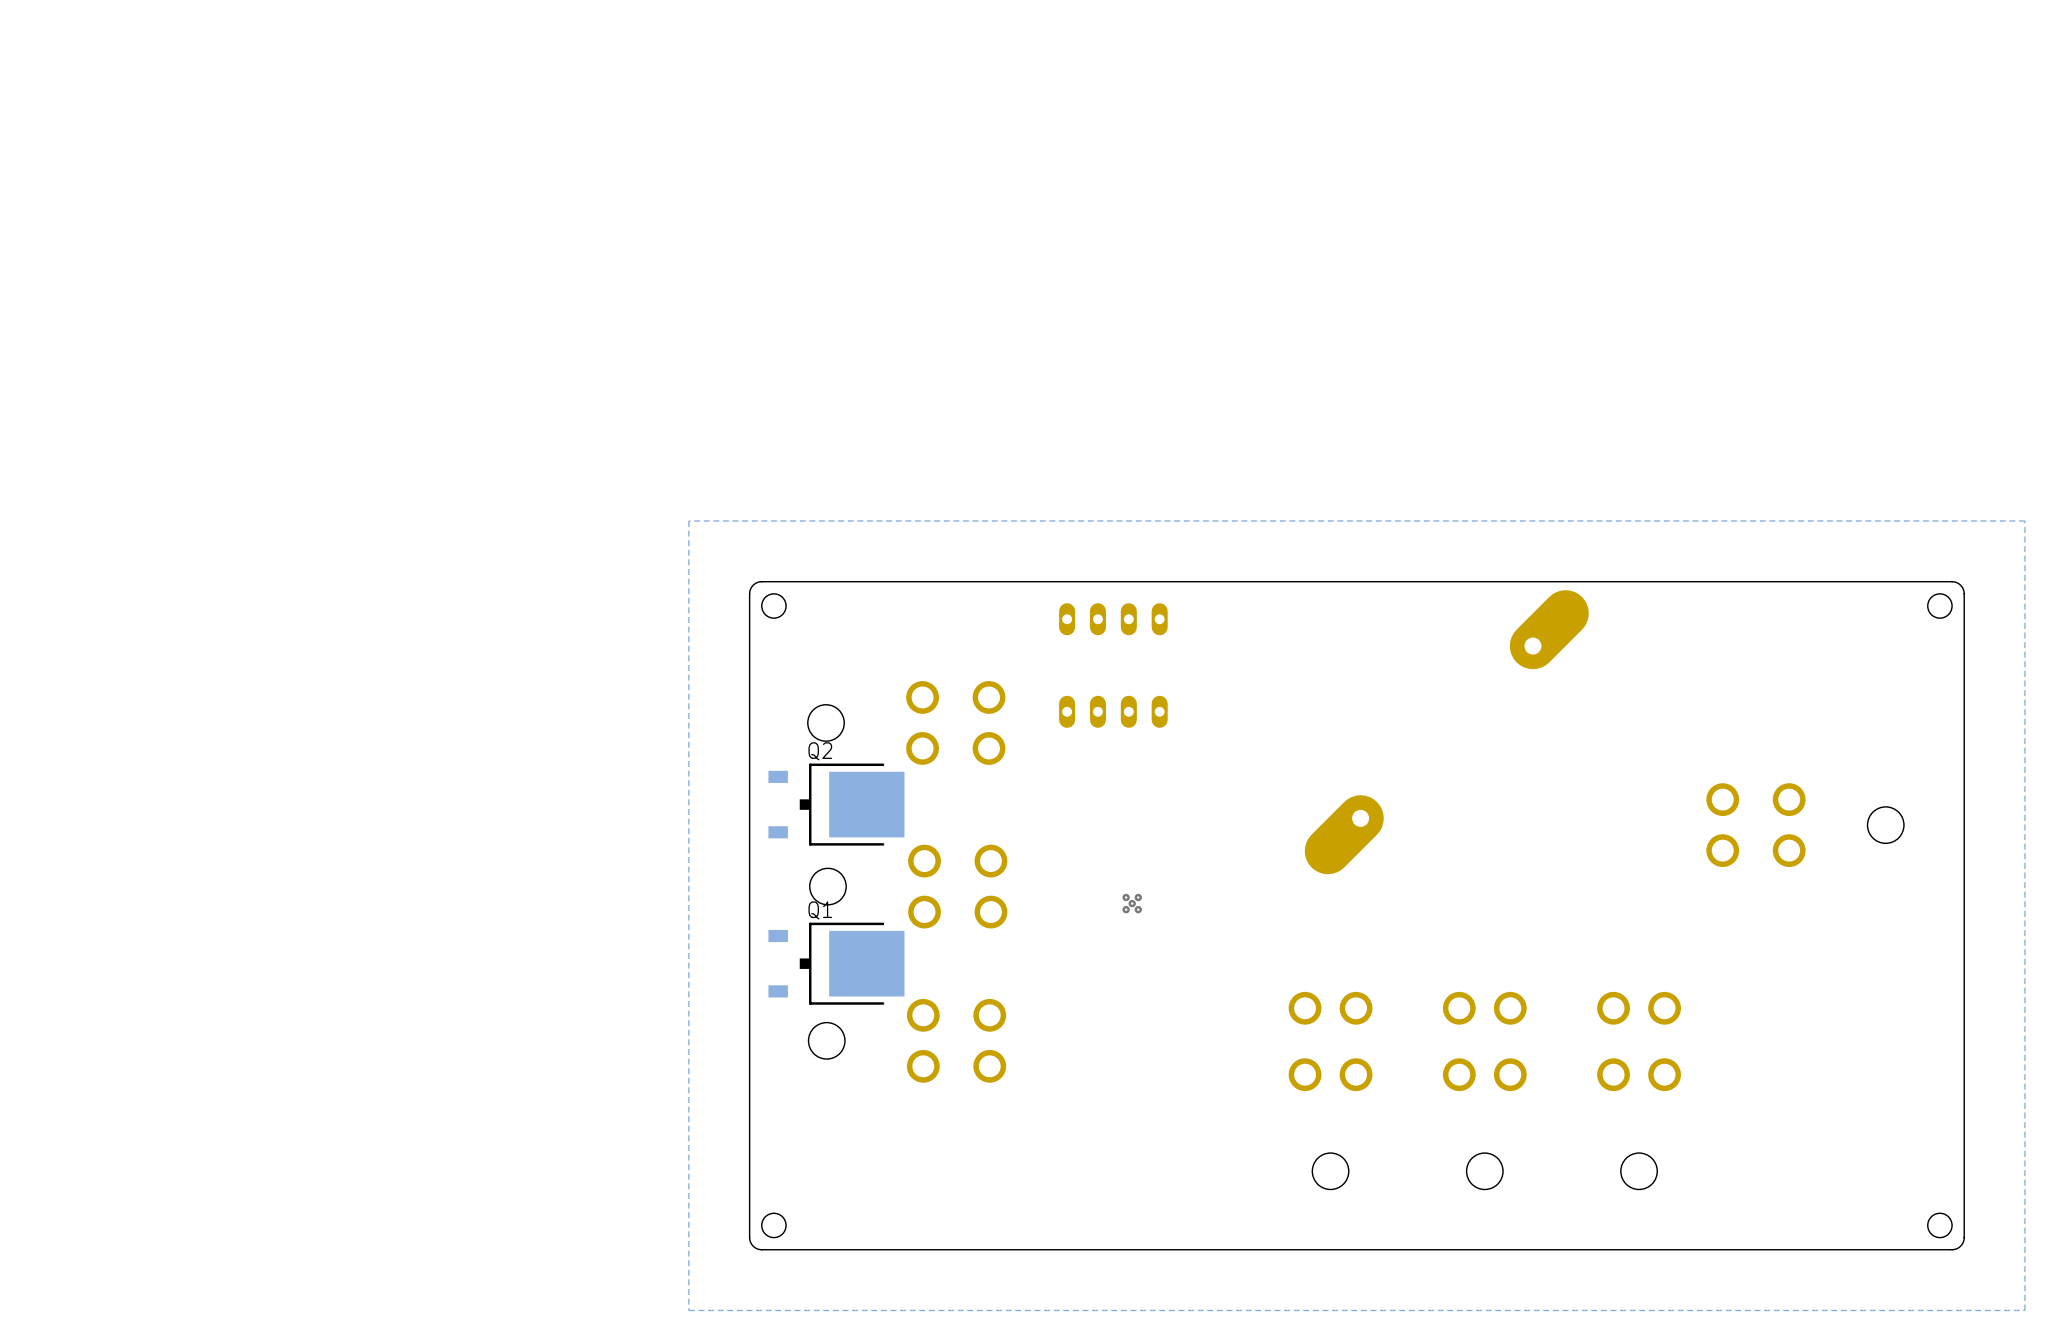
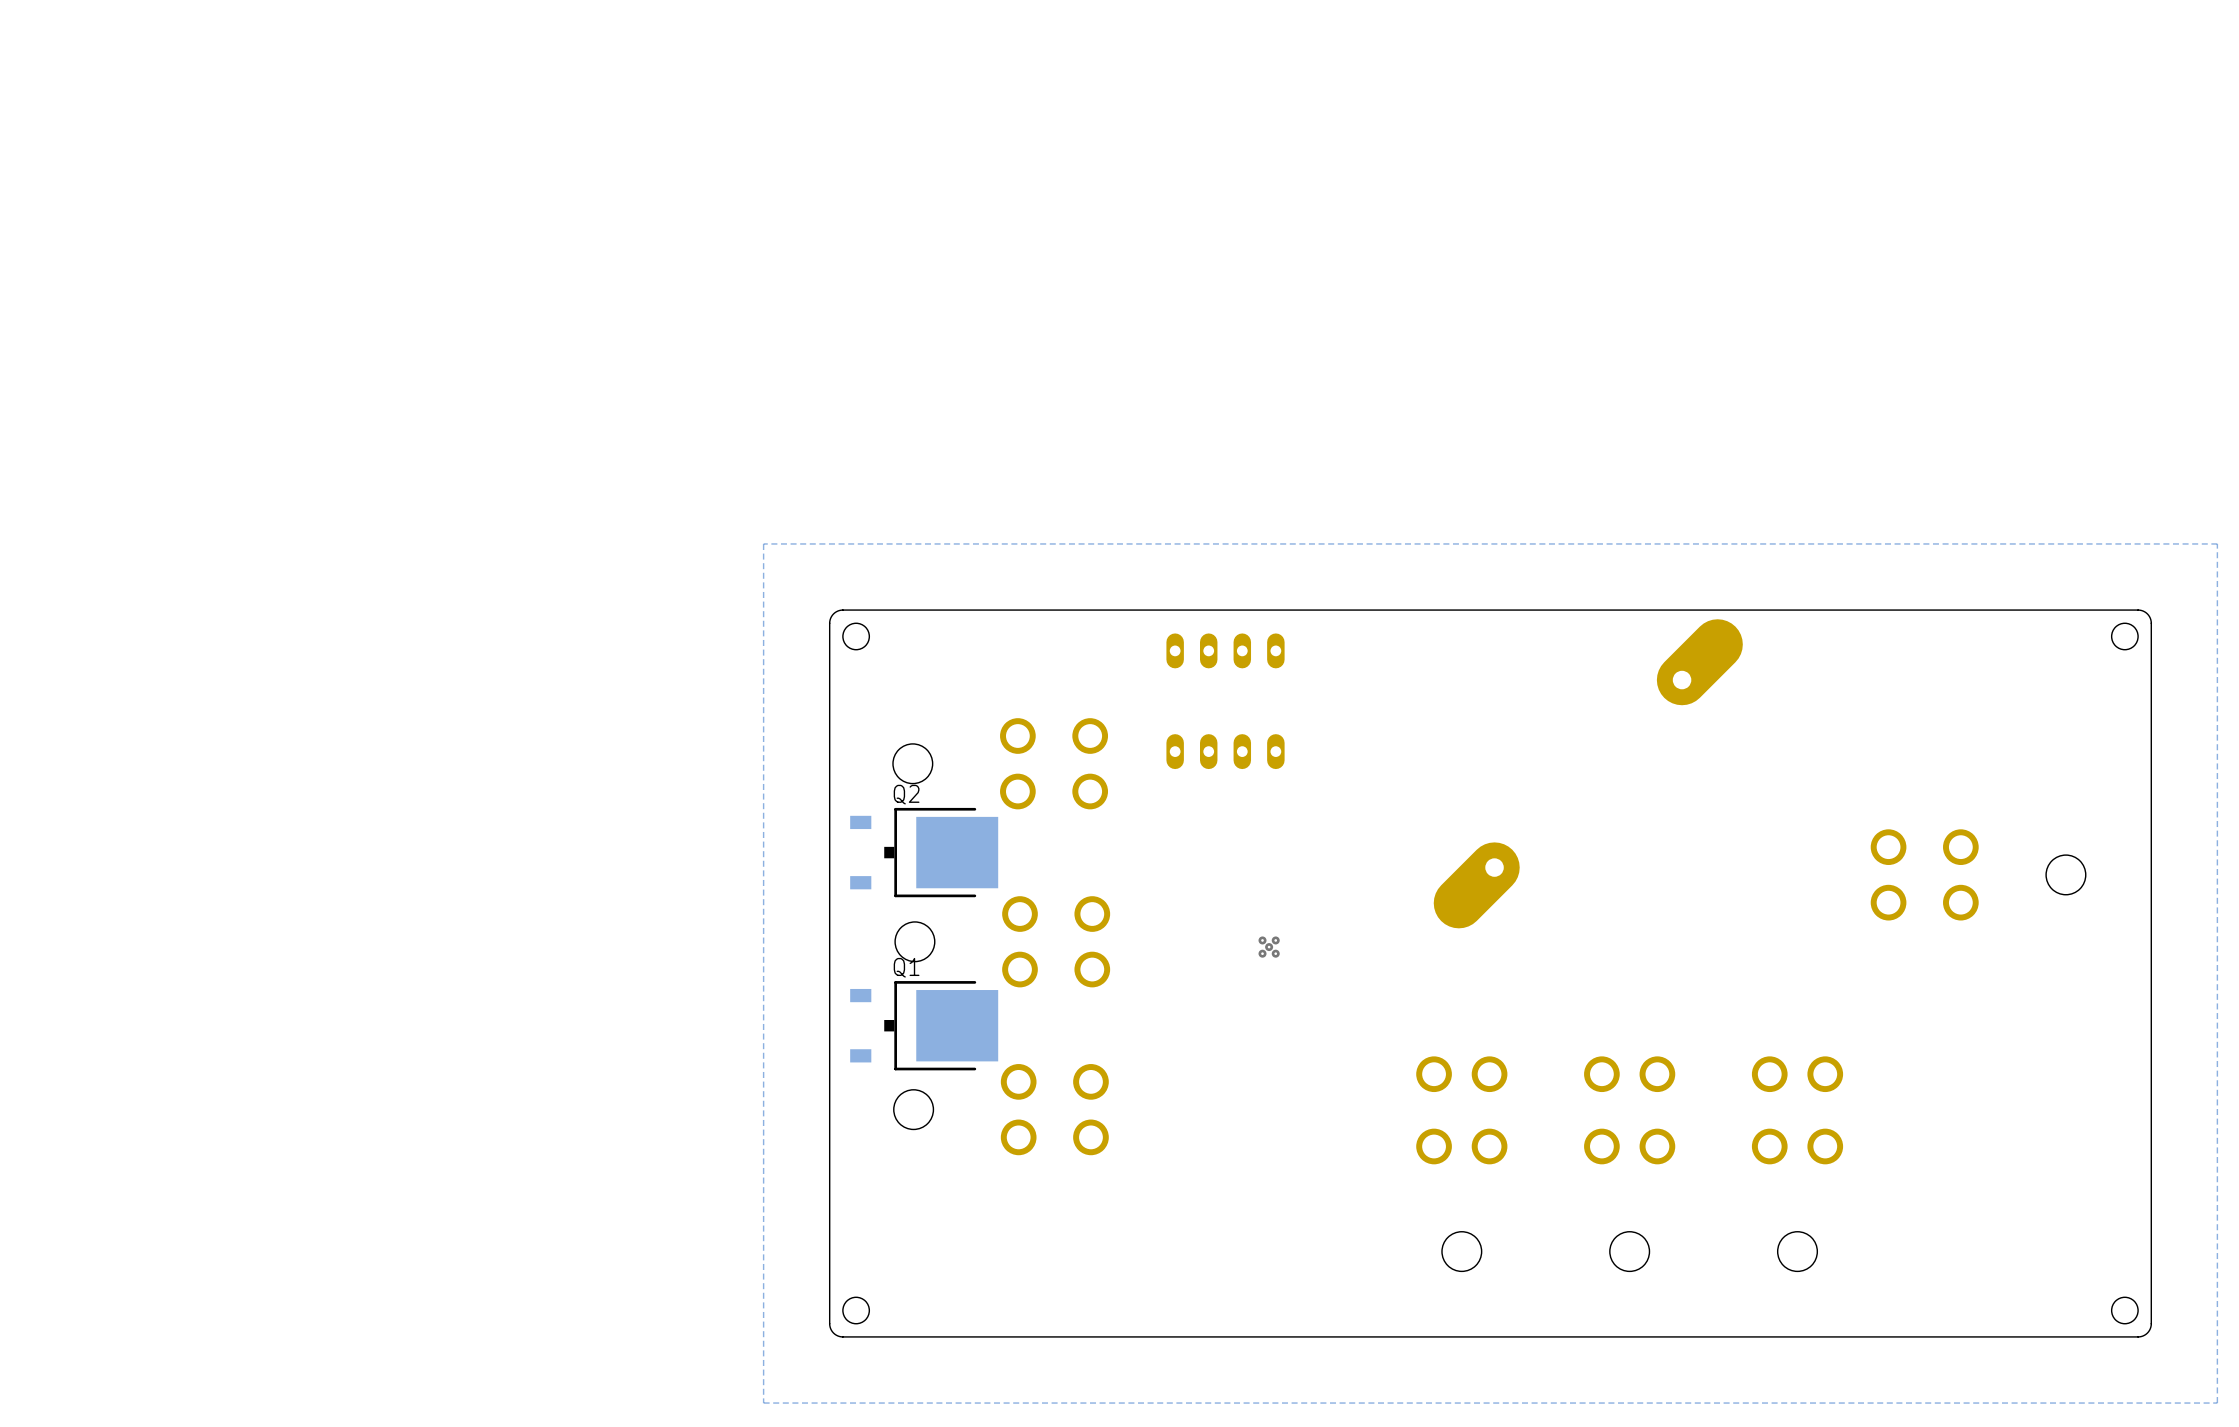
via: none -> (1262, 940)
via: none -> (1275, 940)
via: none -> (1269, 947)
via: (1126, 897) -> none
via: (1138, 897) -> none
via: none -> (1262, 953)
via: none -> (1275, 953)
via: (1132, 903) -> none
via: (1126, 909) -> none
via: (1138, 909) -> none

